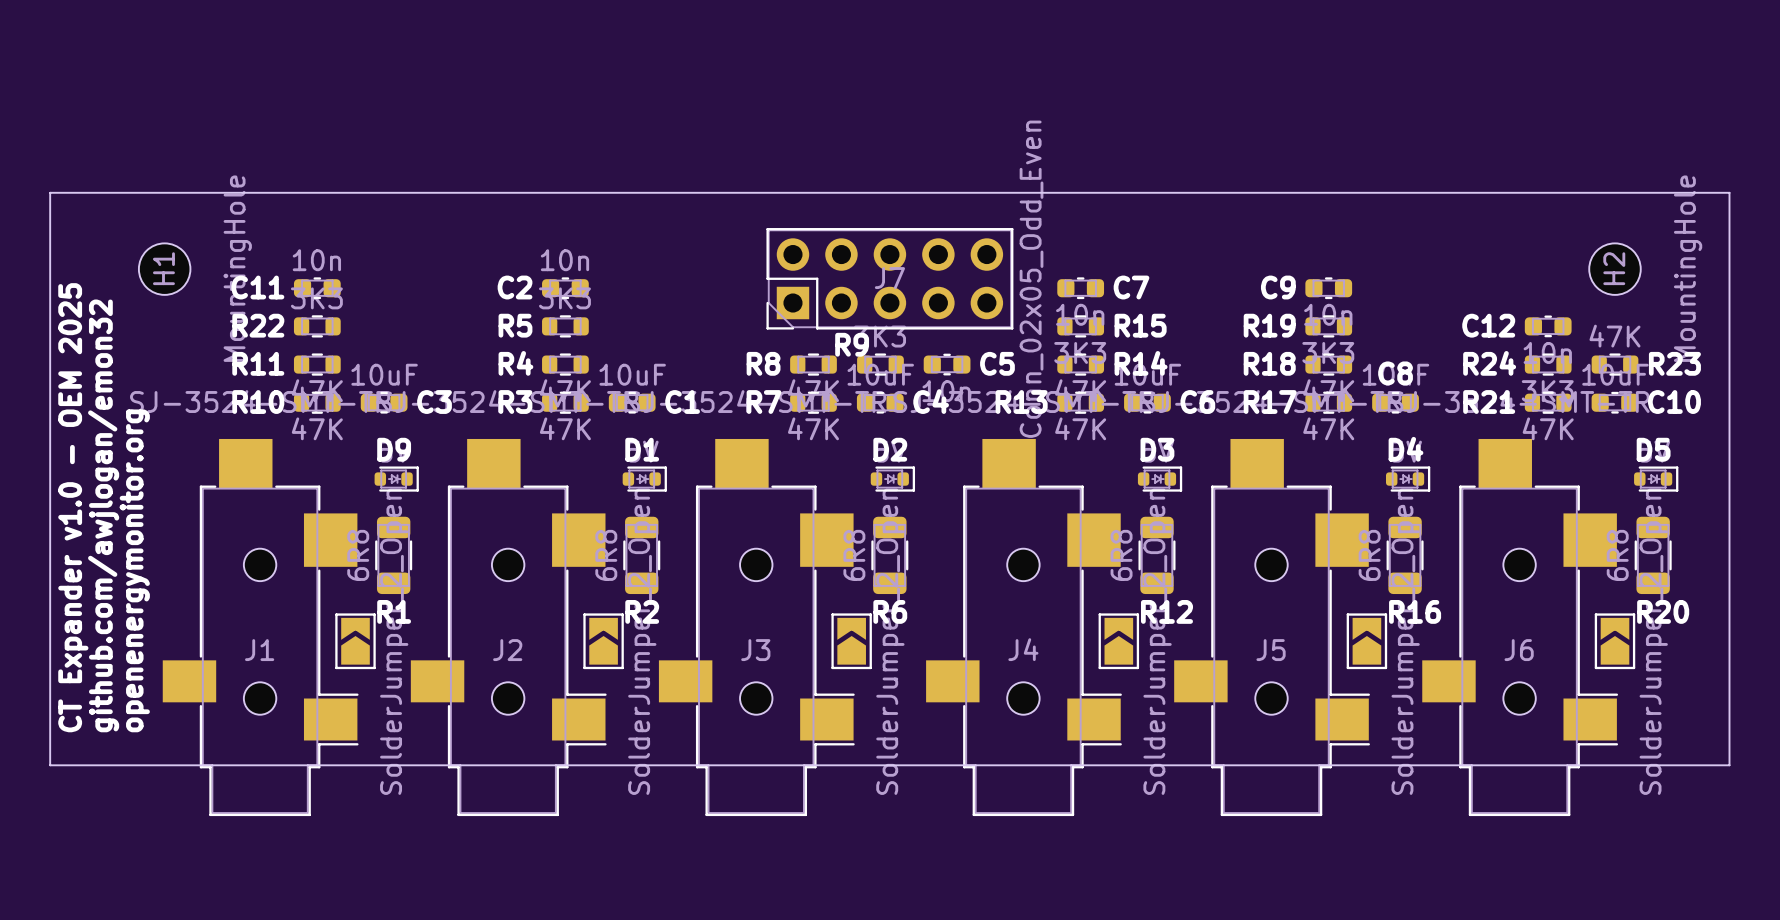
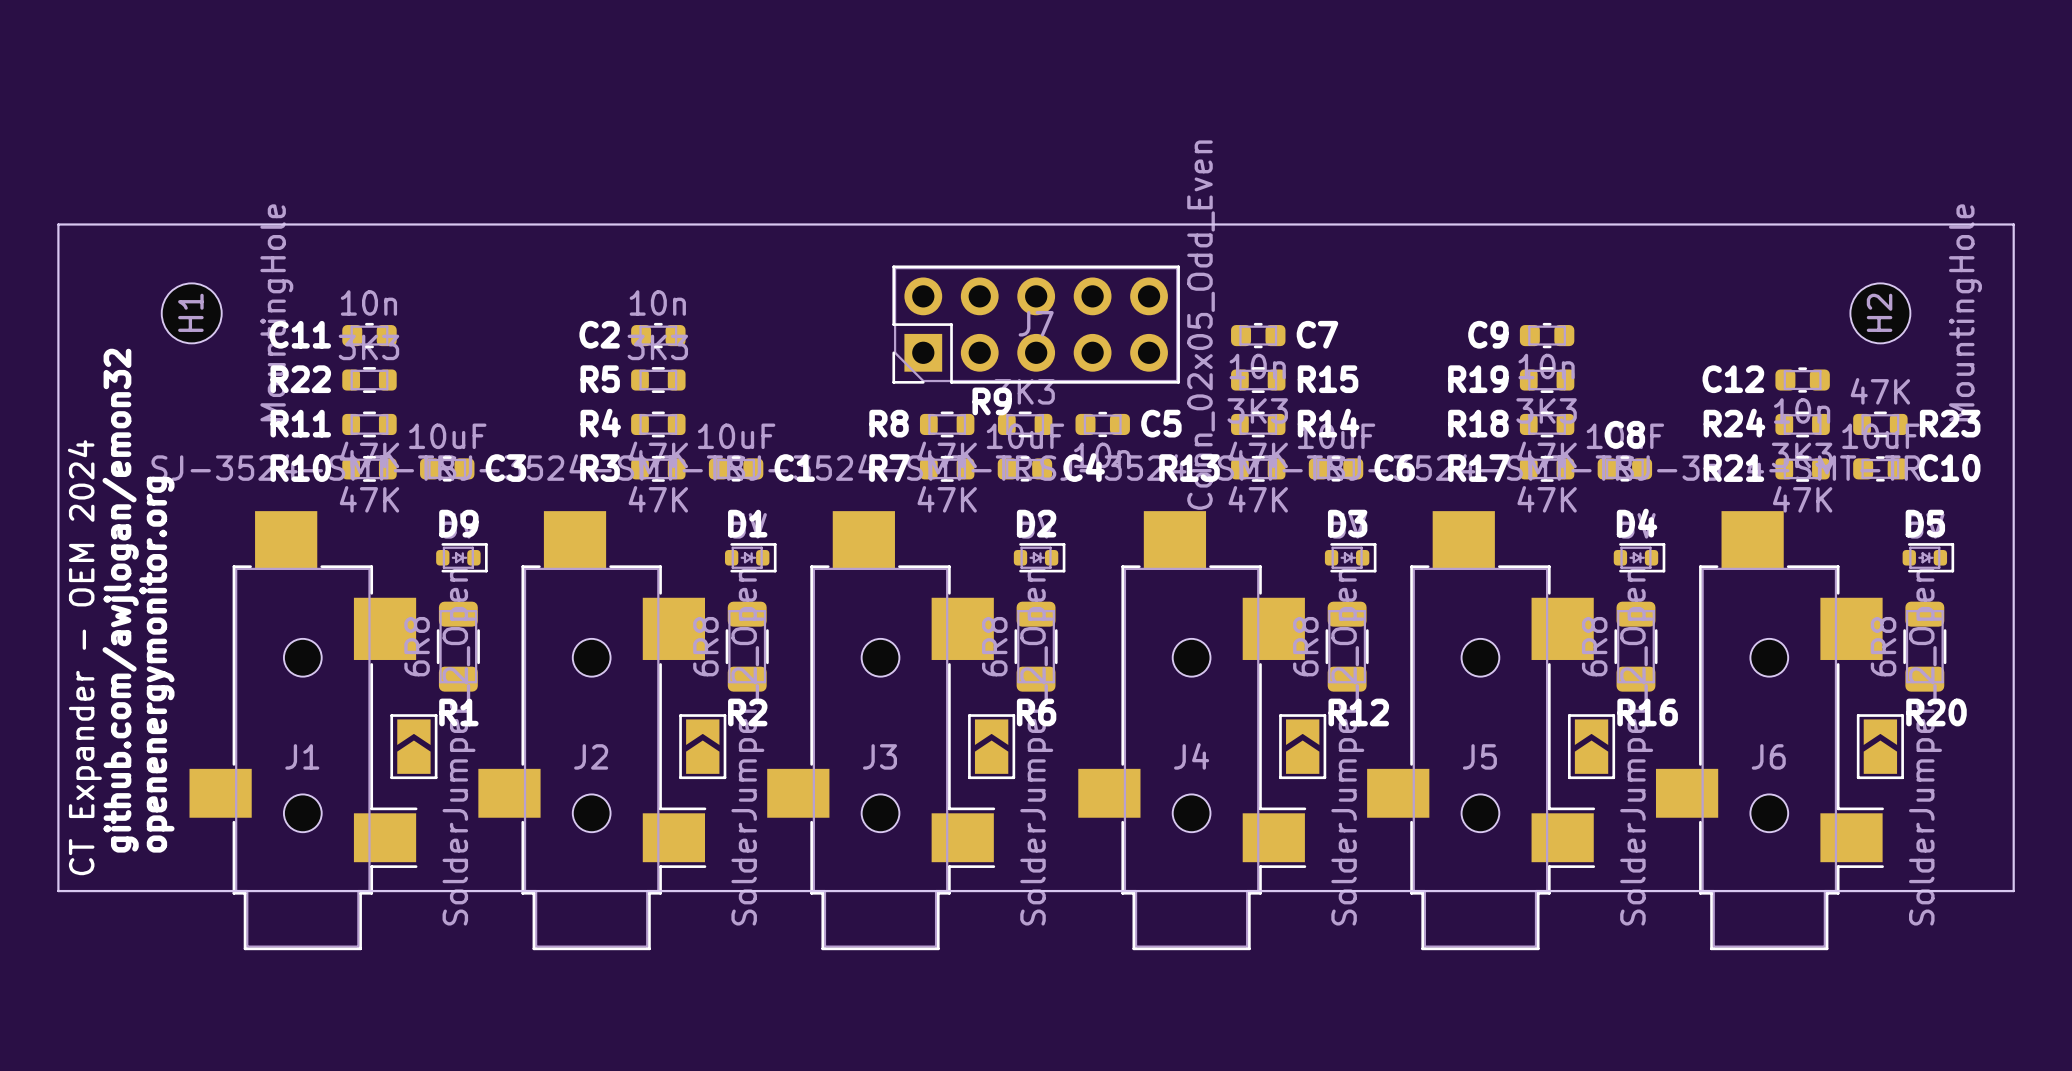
text: CT Expander v1.0 - OEM 2025 (73, 507) -> CT Expander - OEM 2024 (84, 657)

